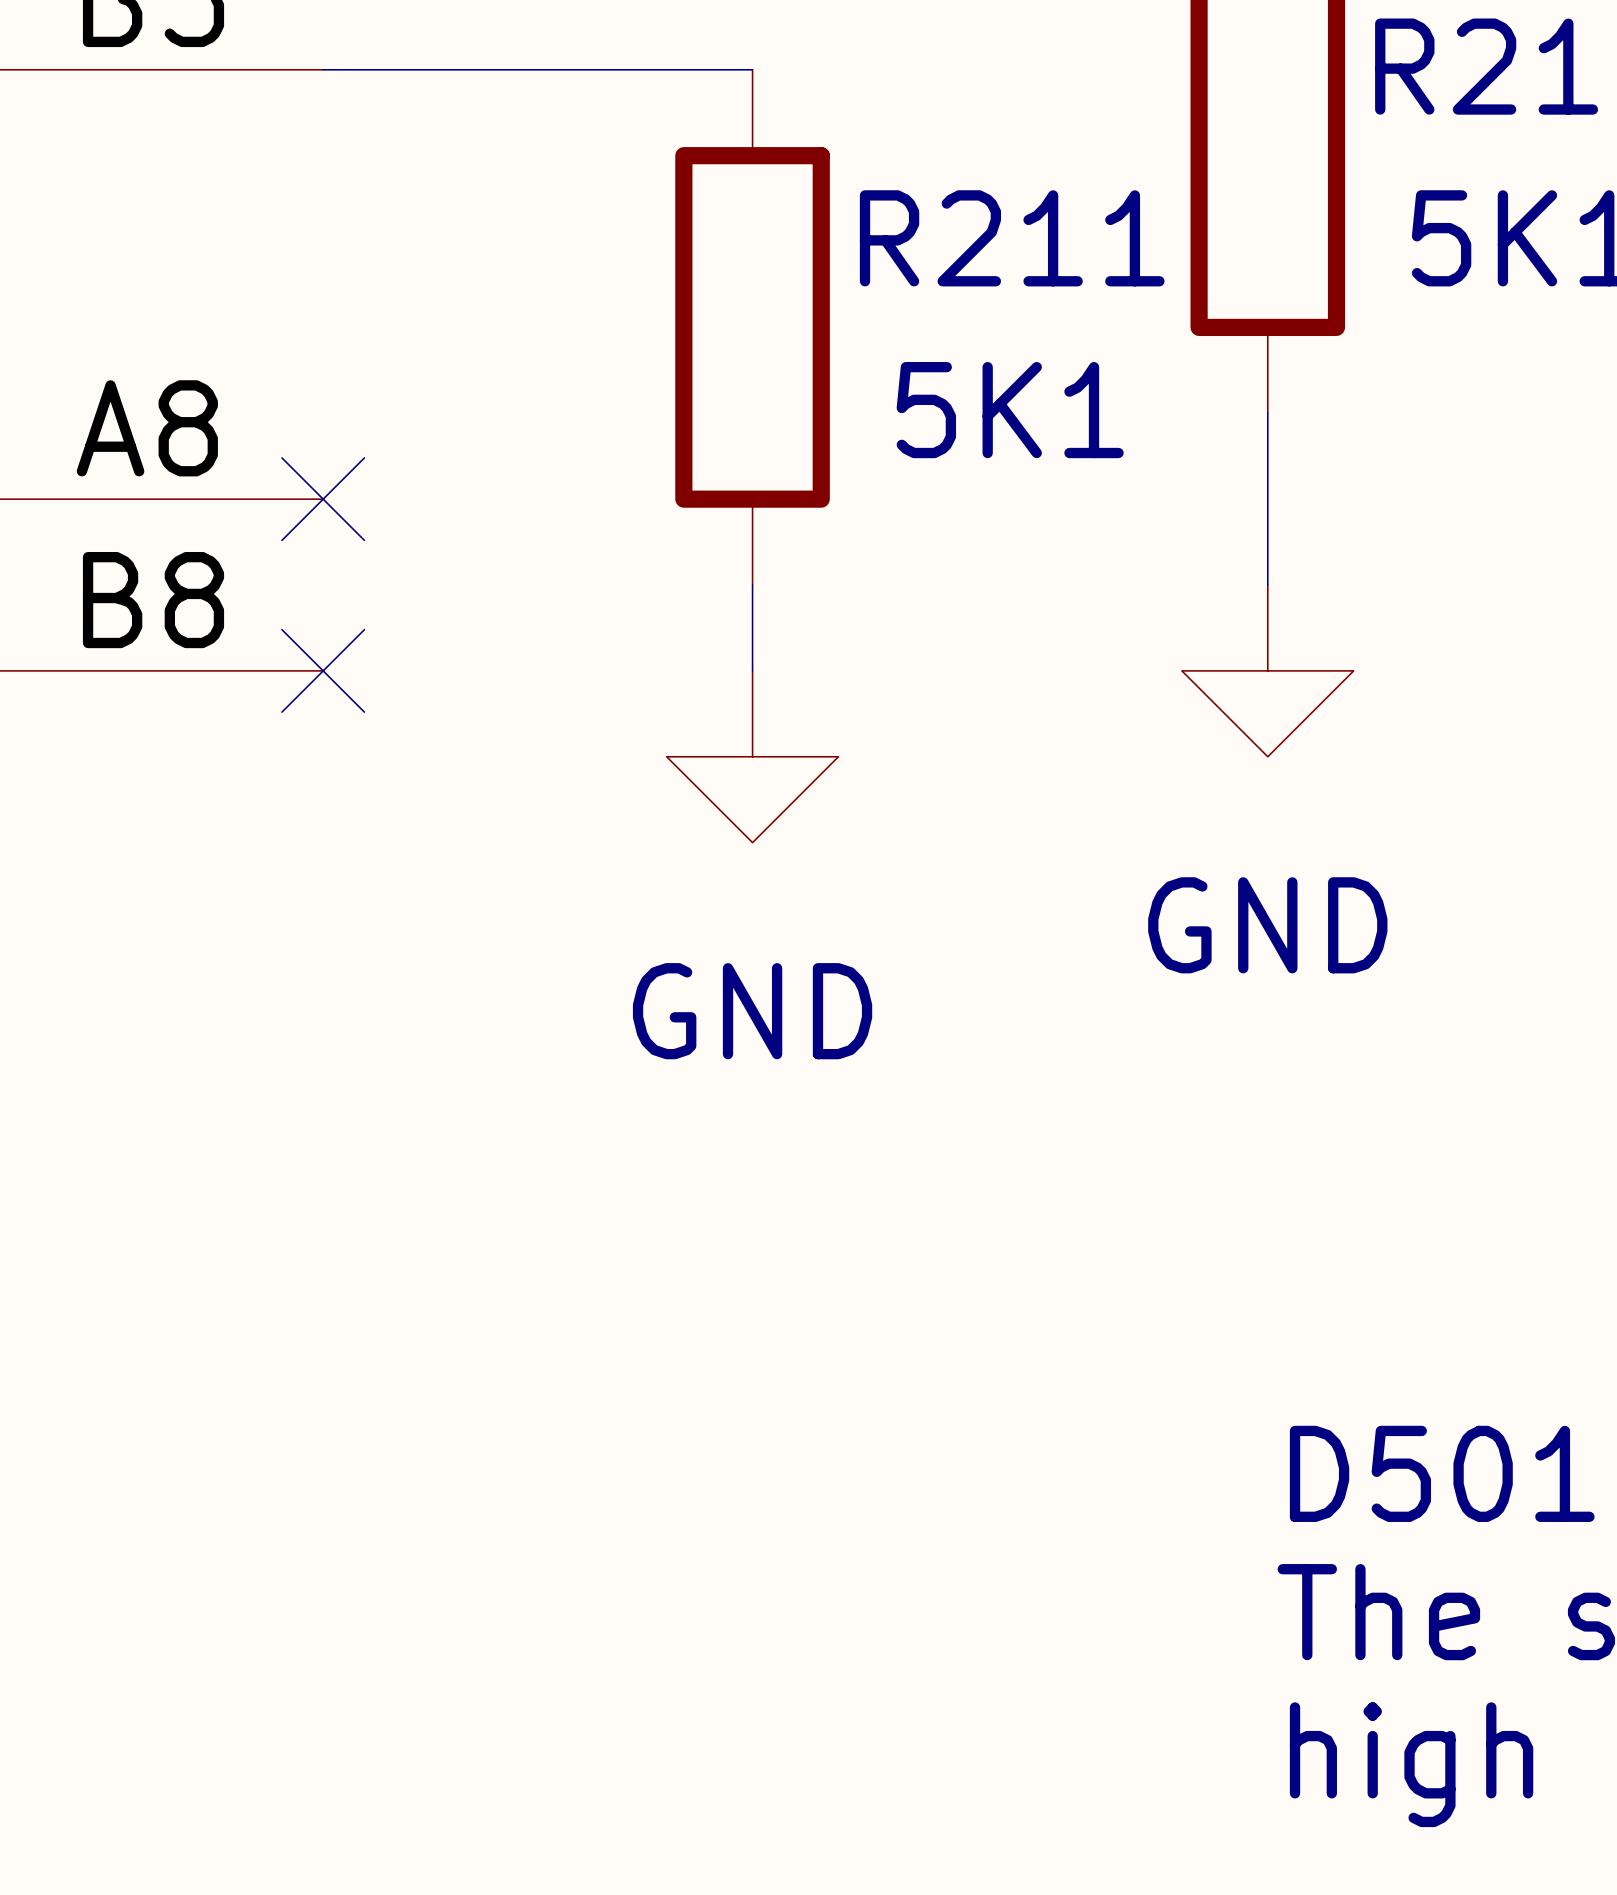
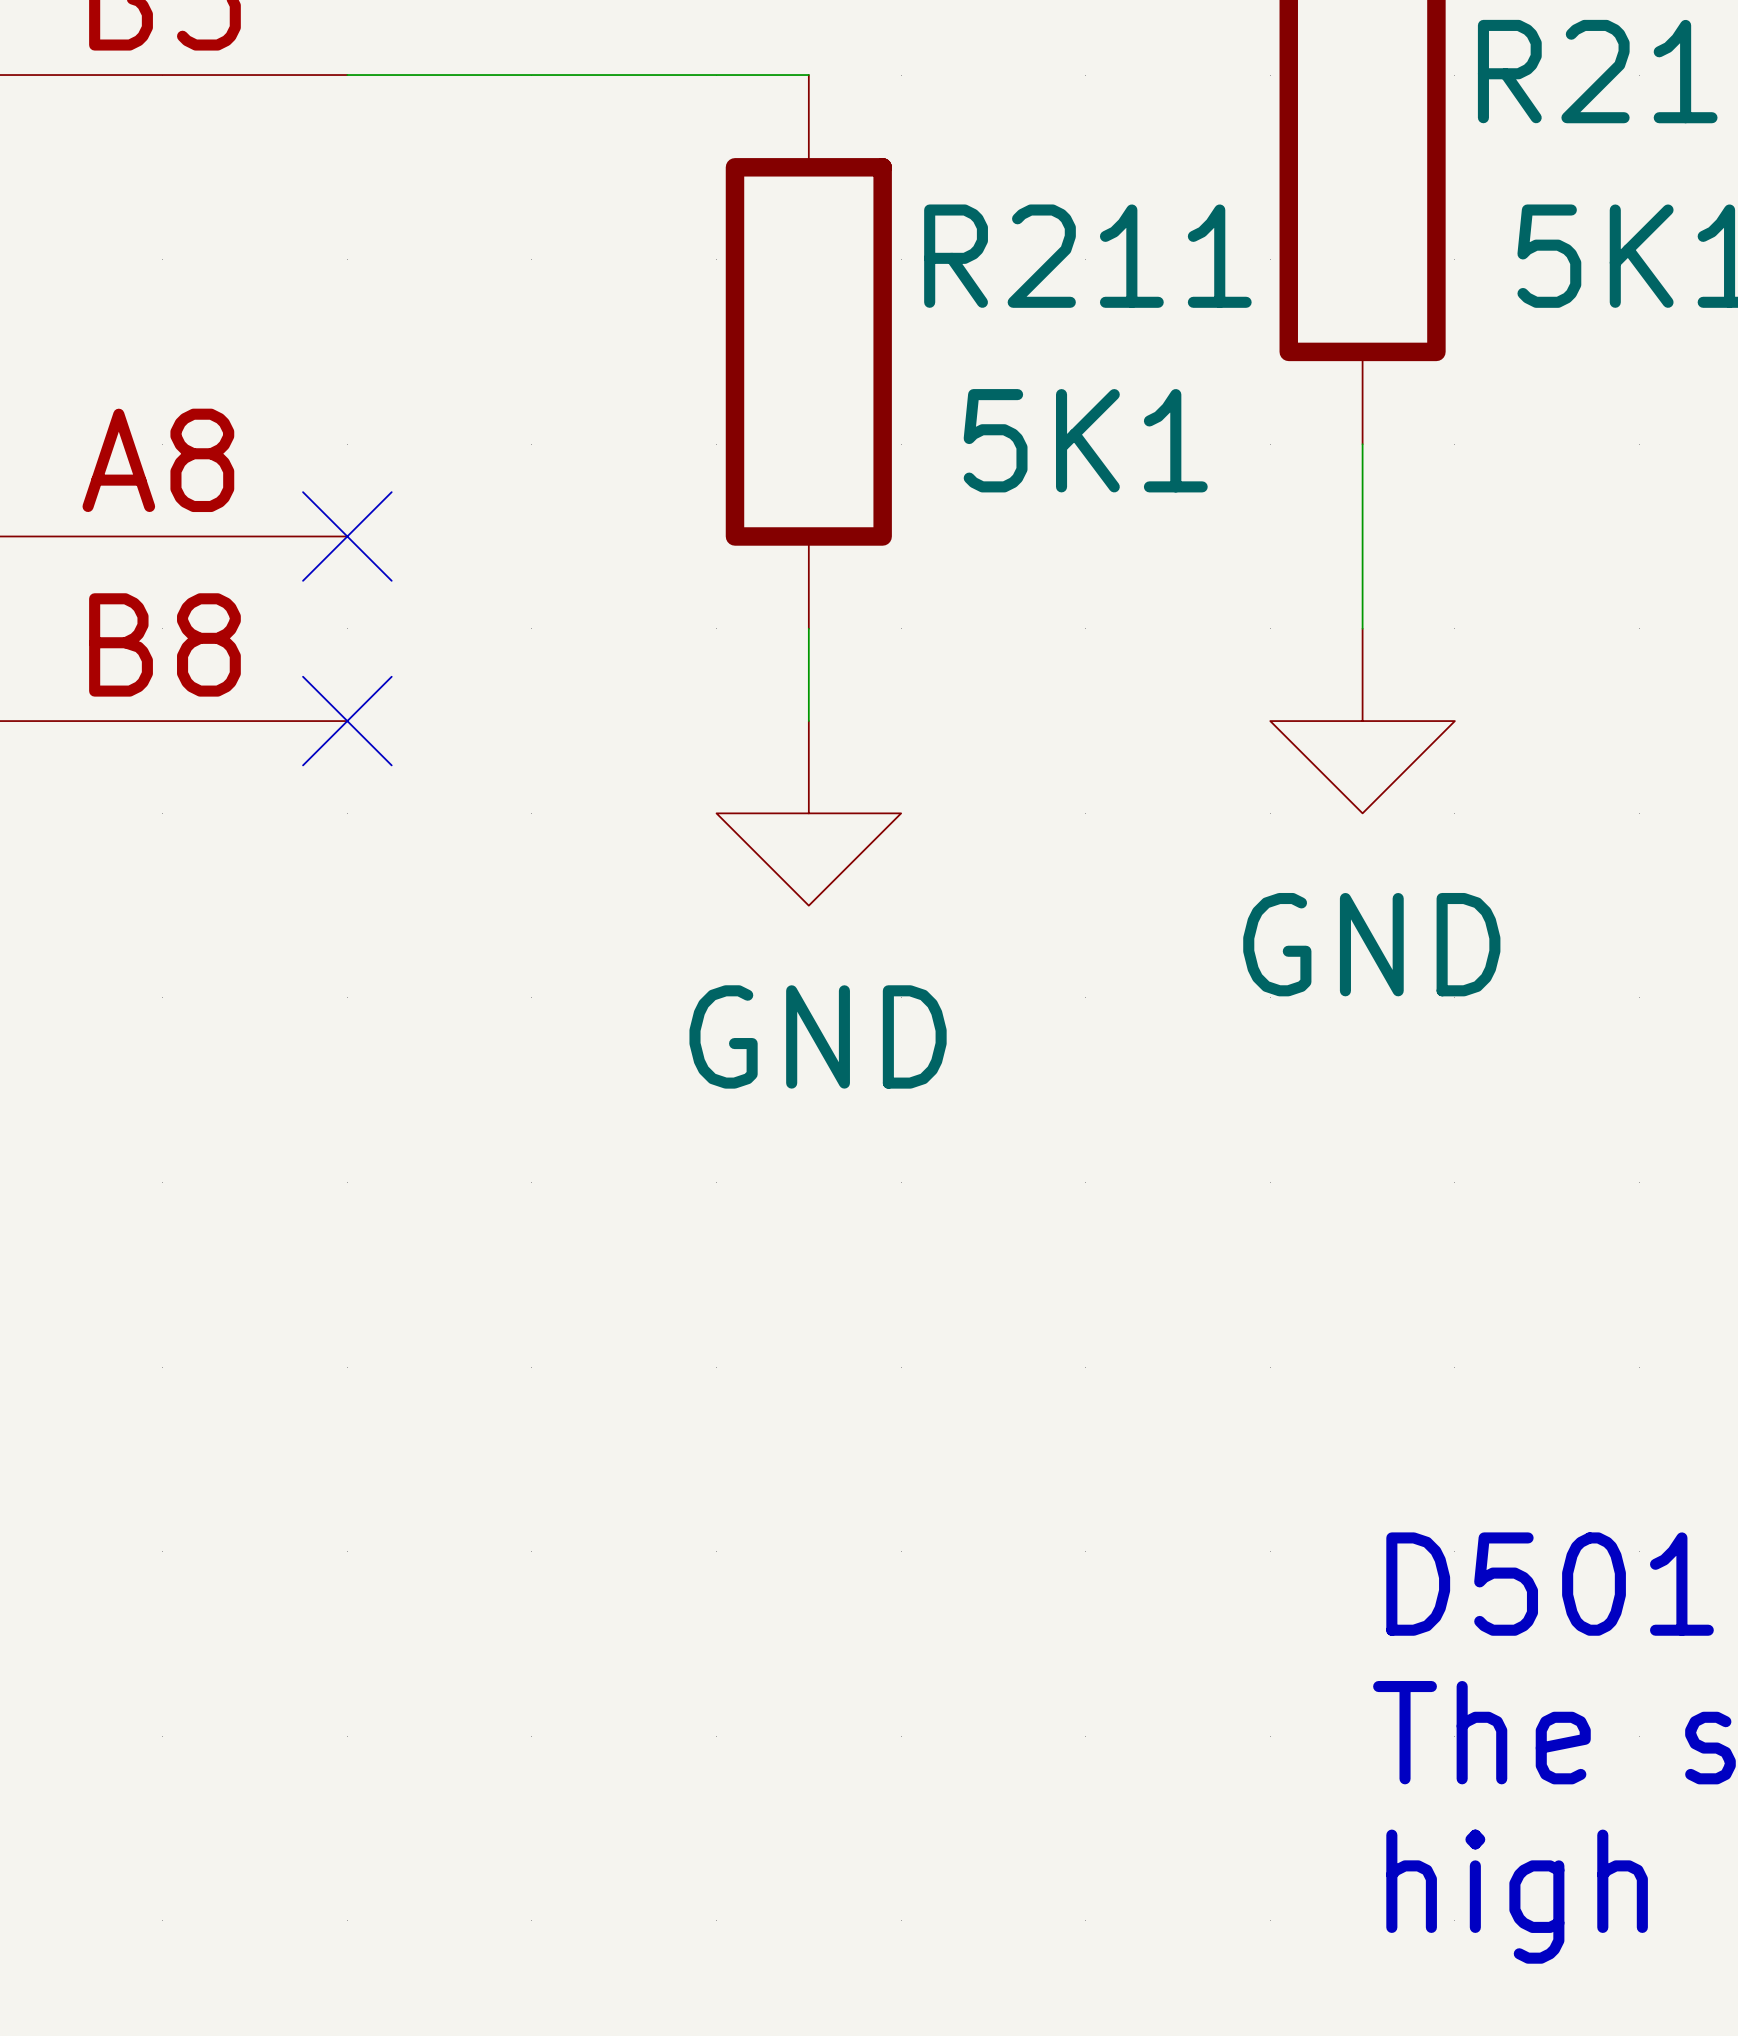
power symbol text position: GND (1267, 925) -> GND (1371, 944)
power symbol text position: GND (752, 1011) -> GND (818, 1036)

